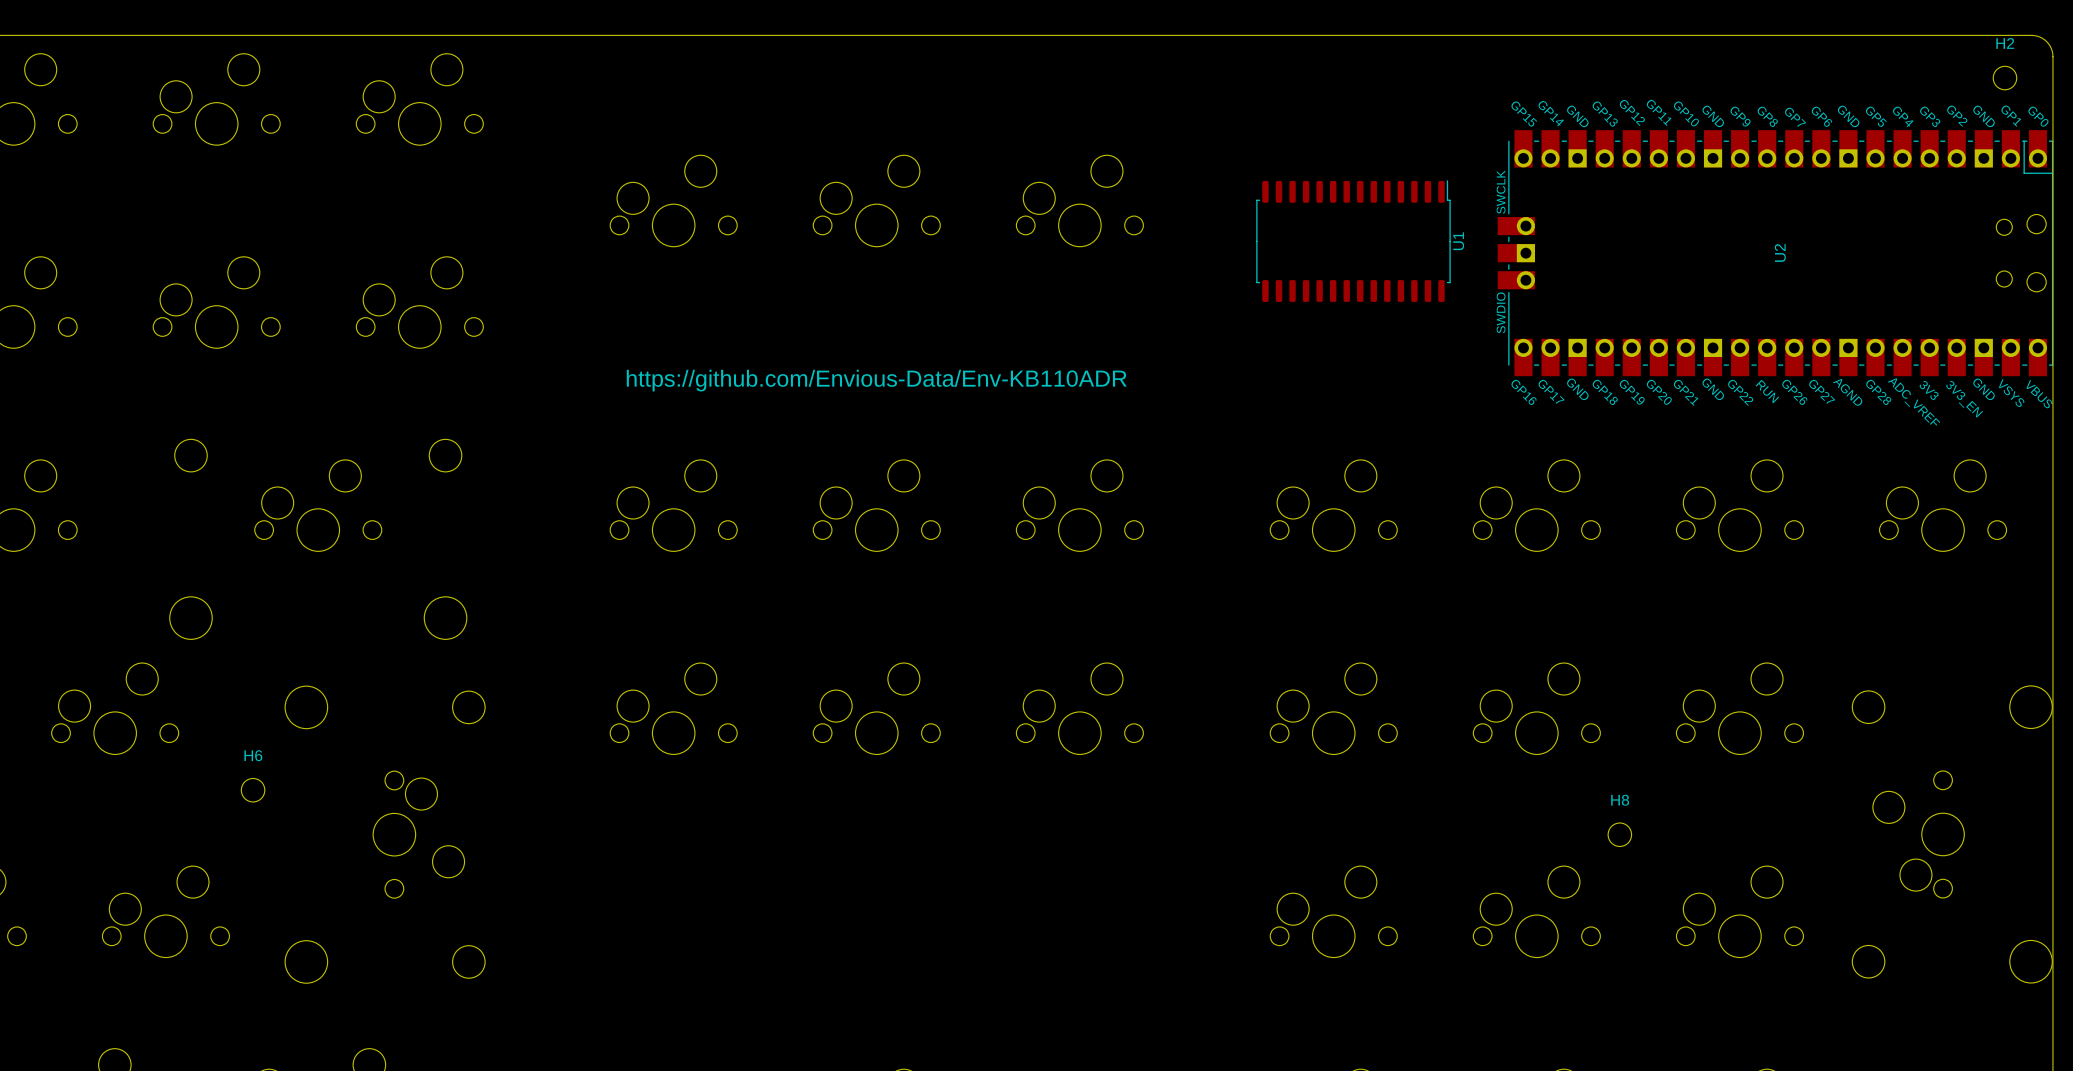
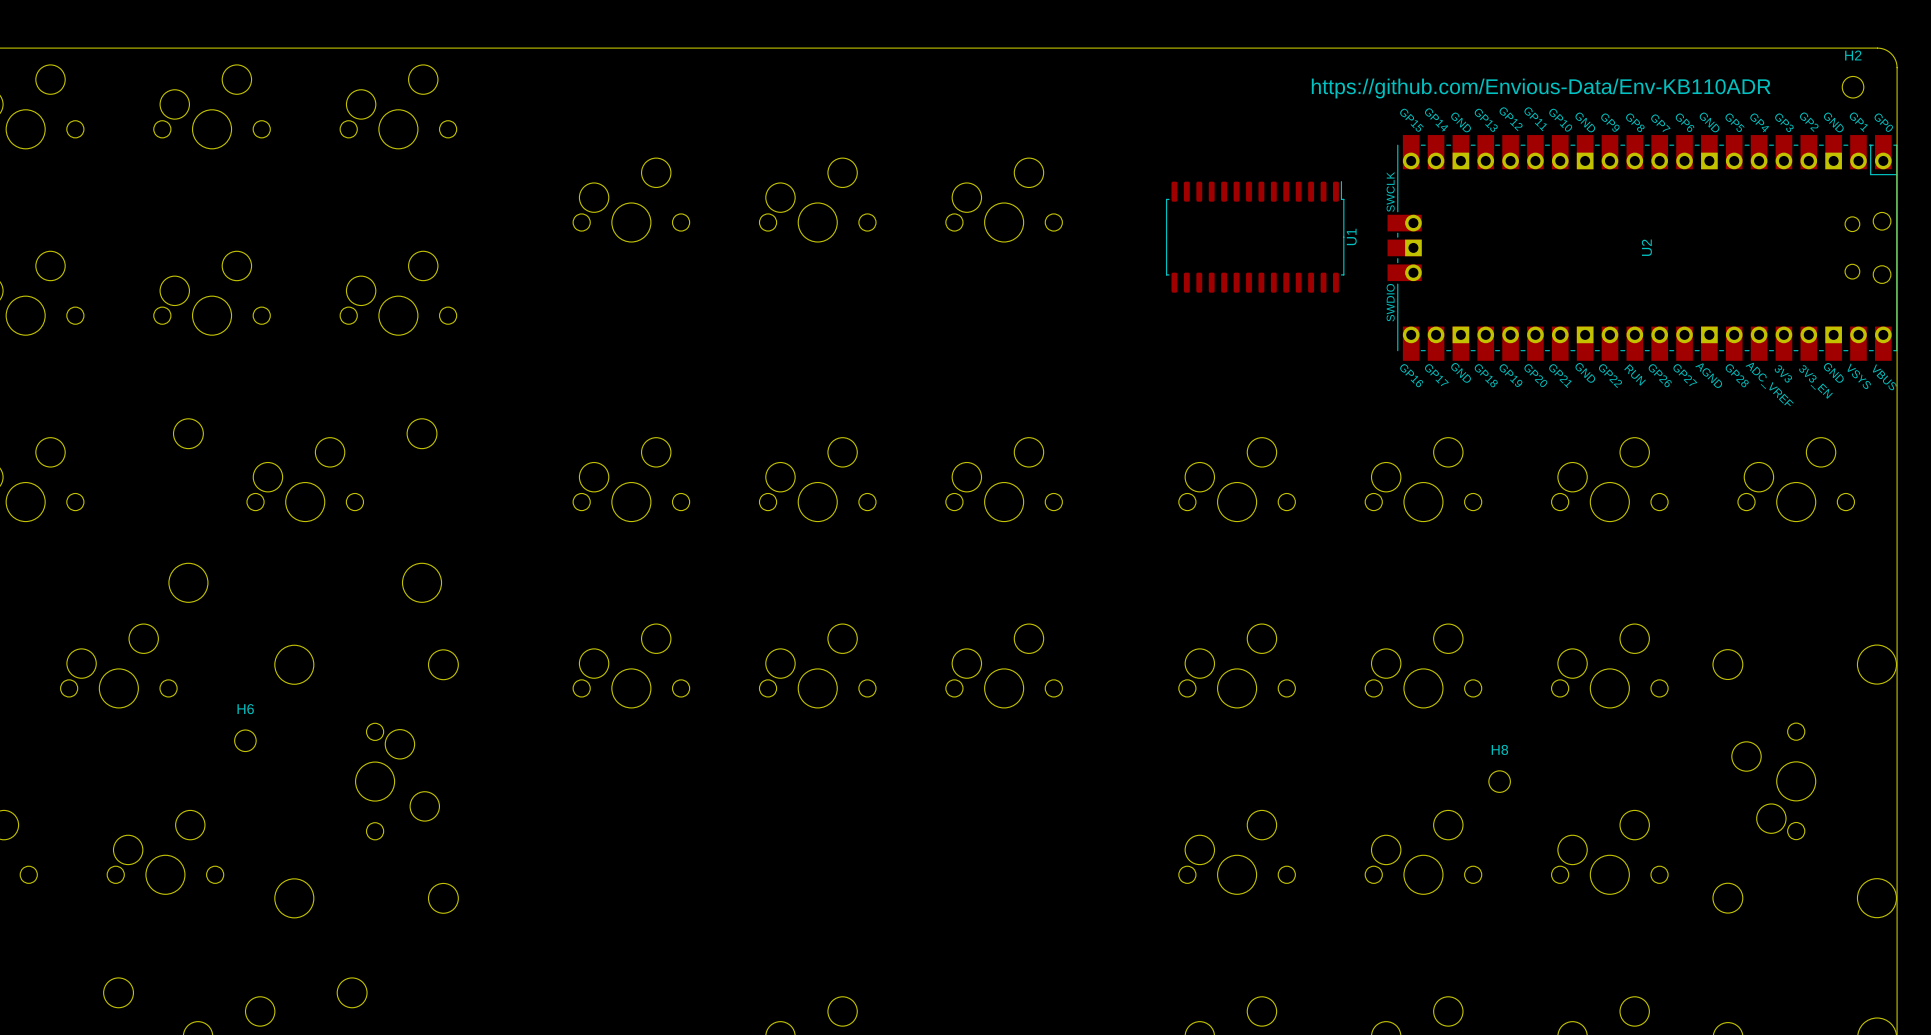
text: none -> https://github.com/Envious-Data/Env-KB110ADR (1541, 88)
text: https://github.com/Envious-Data/Env-KB110ADR (876, 380) -> none

